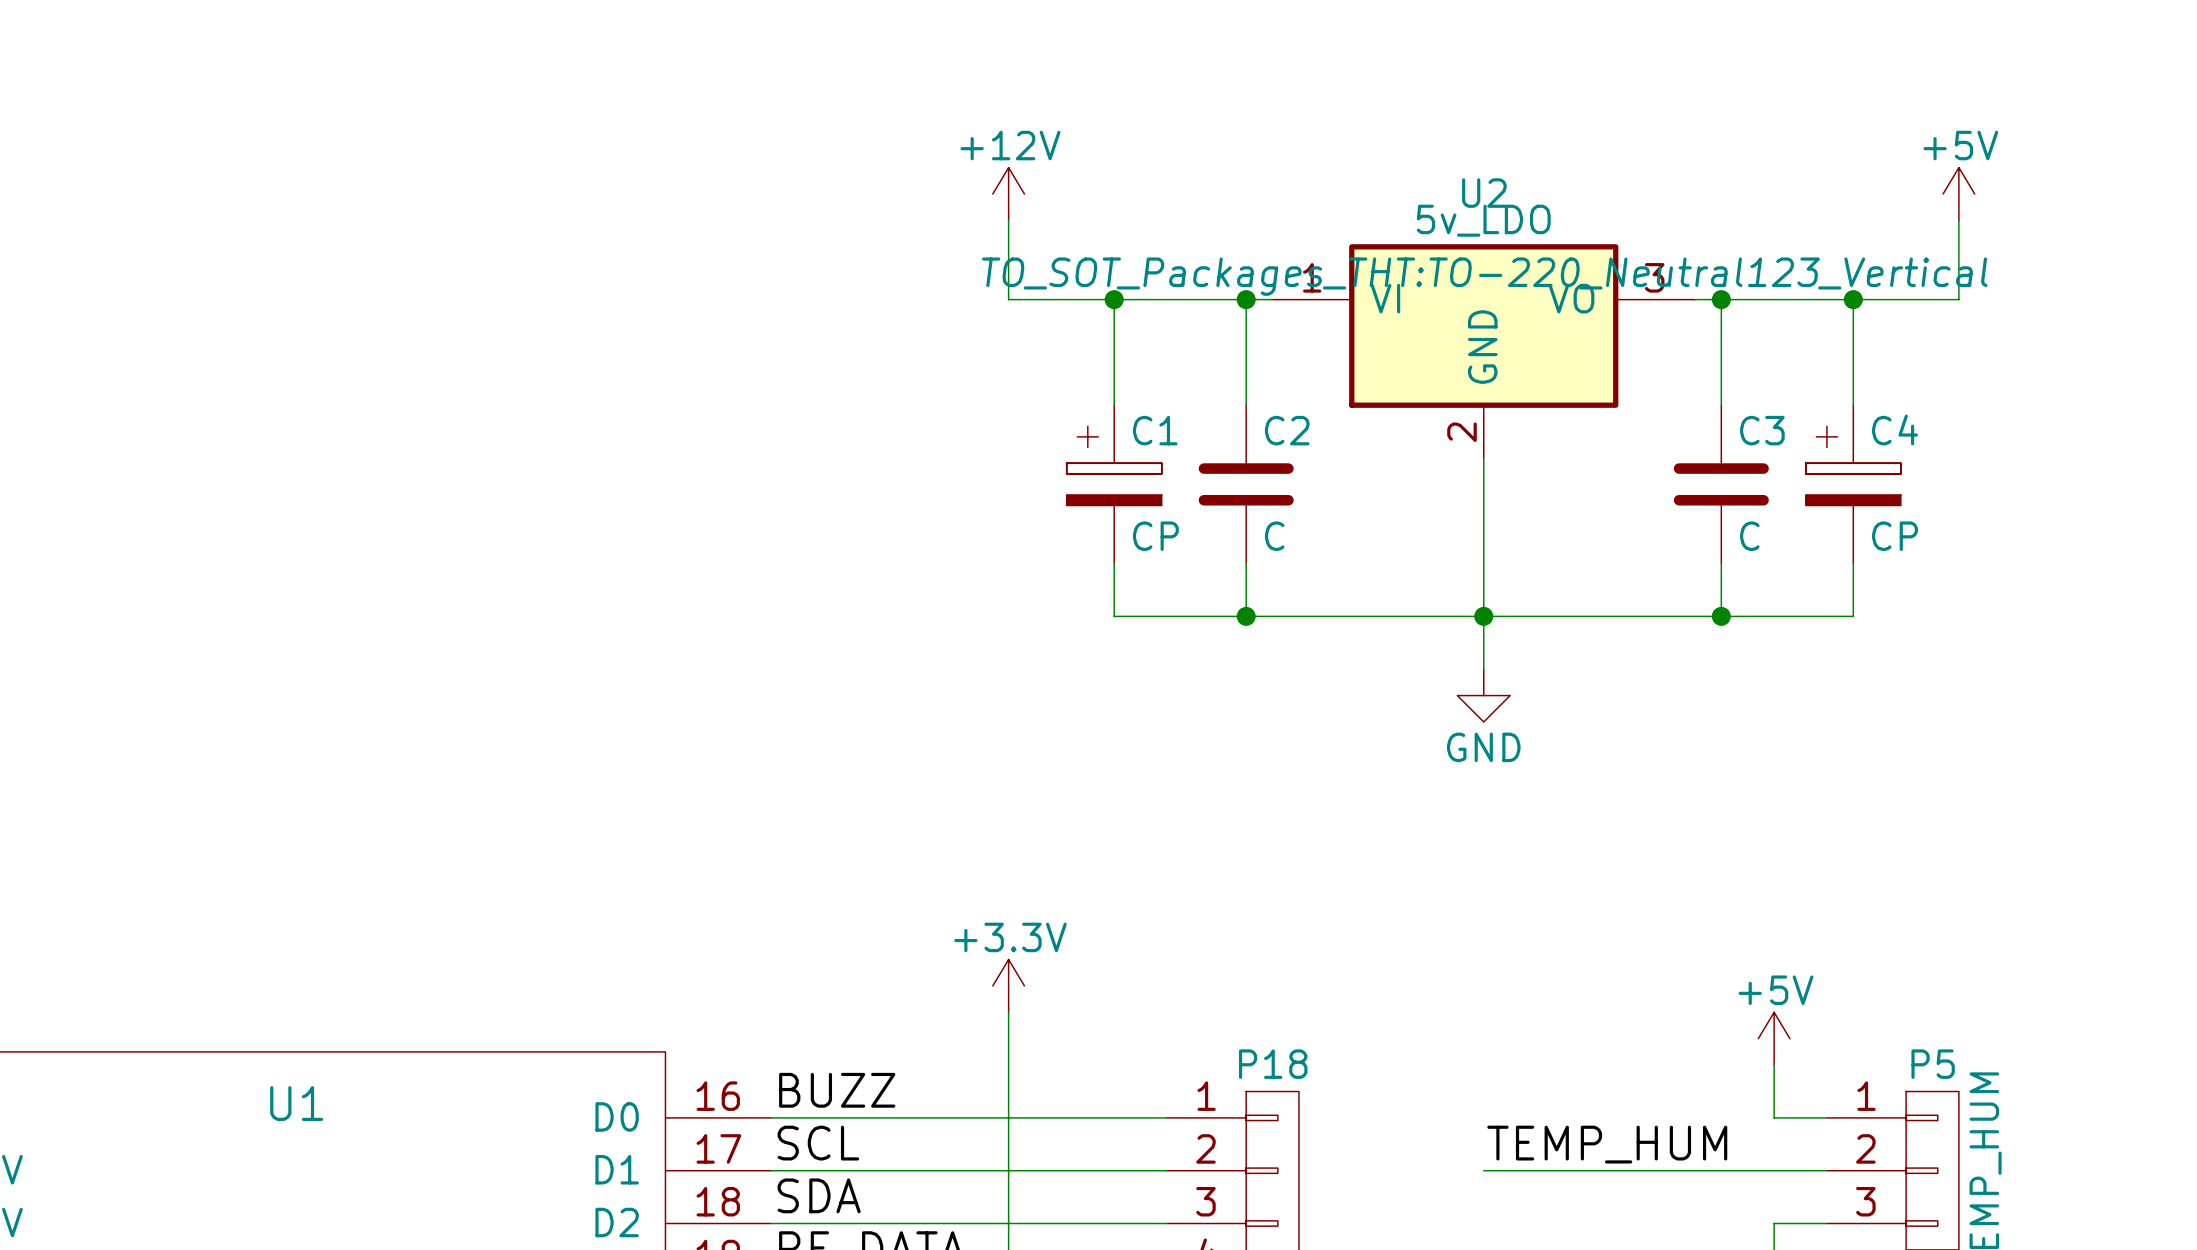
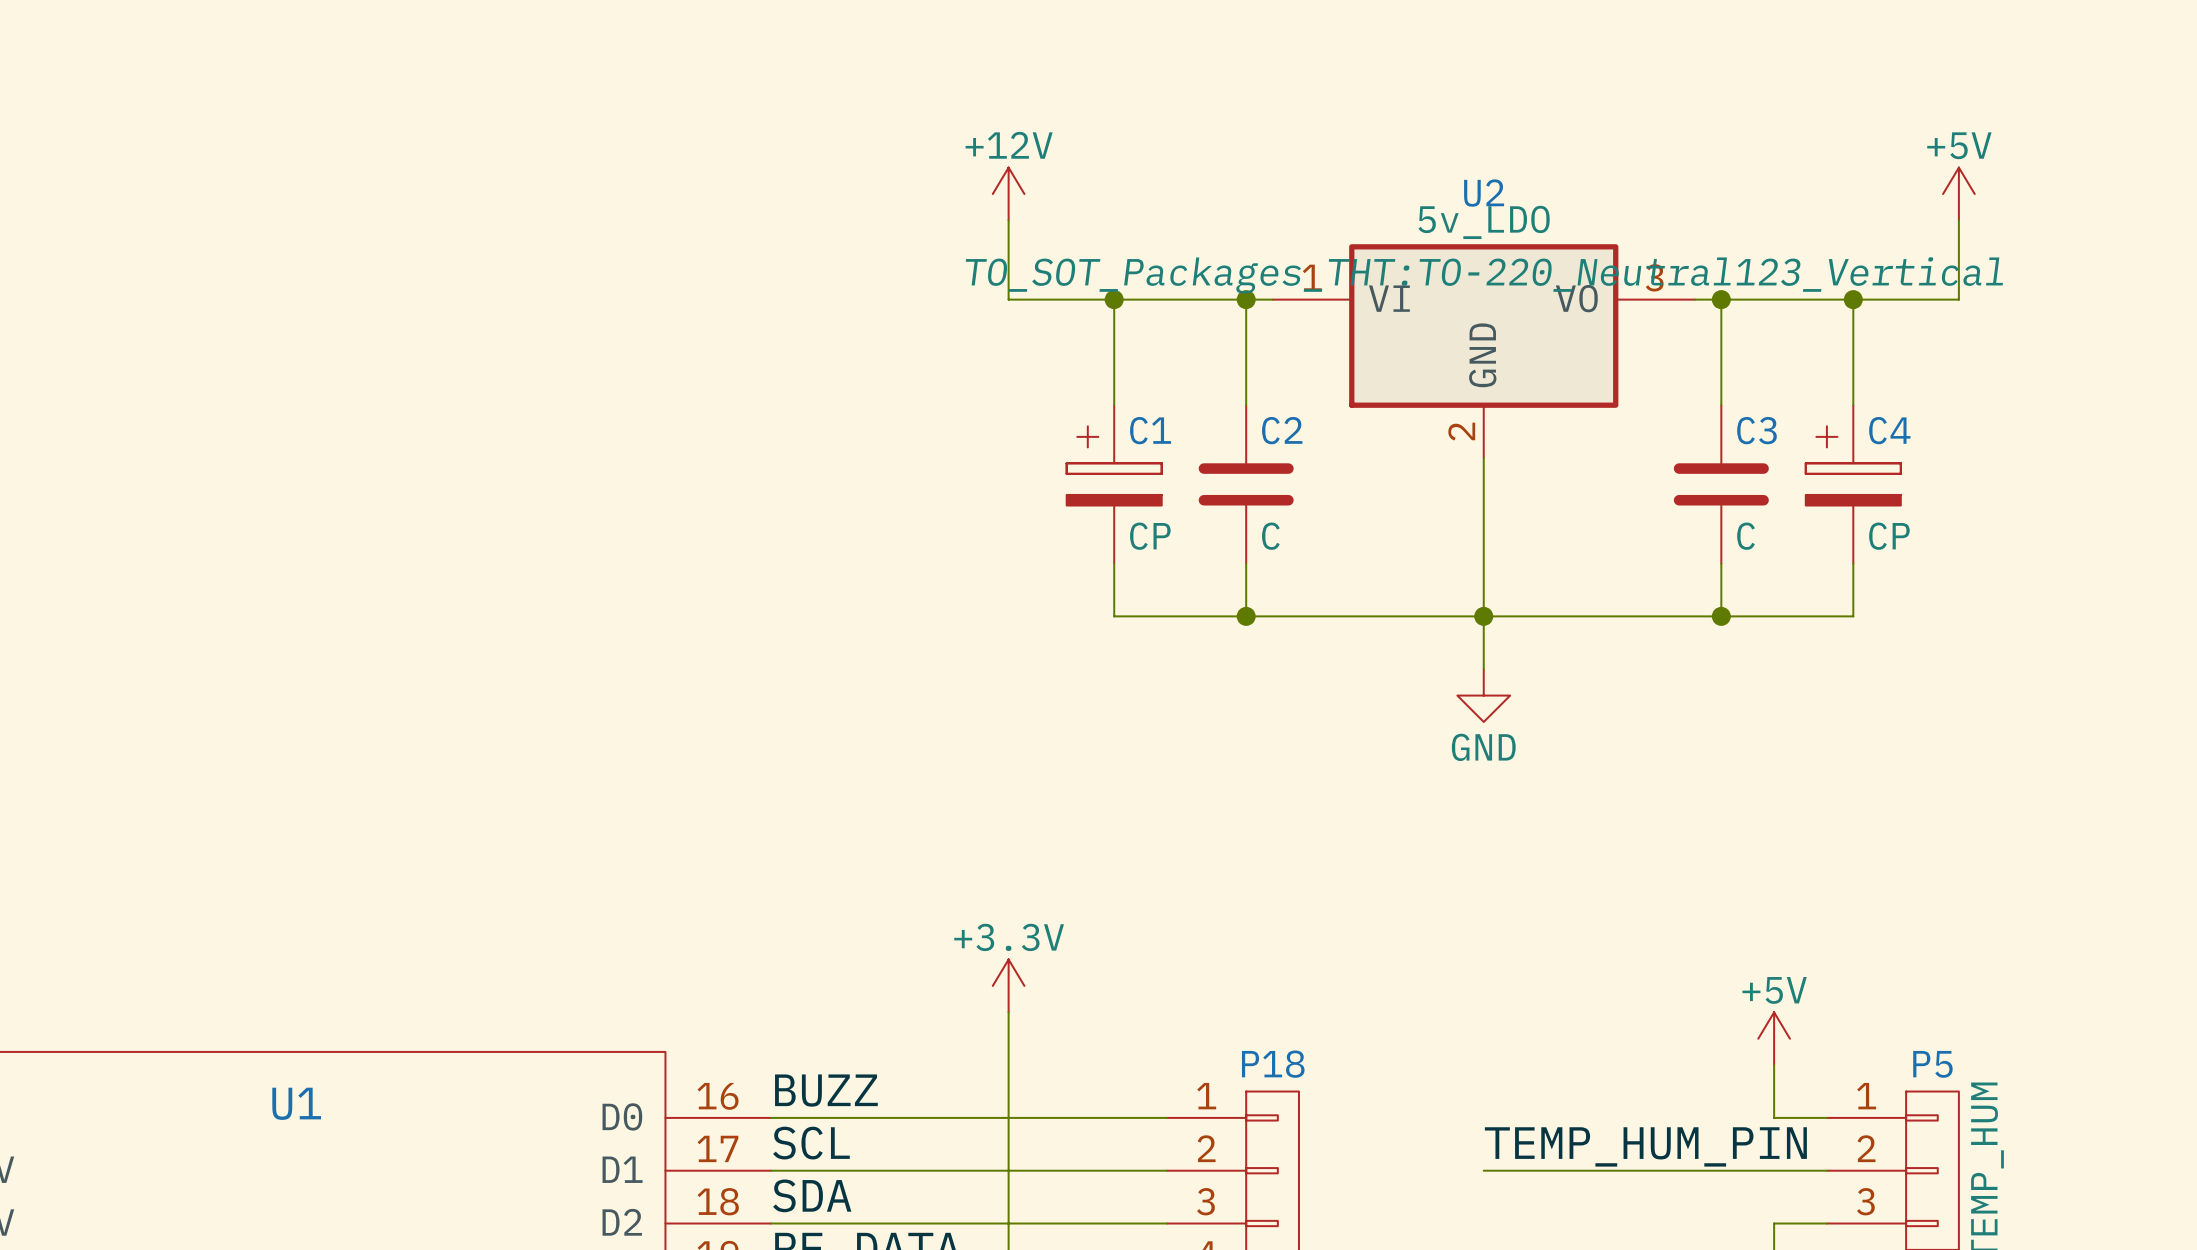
label: TEMP_HUM (1607, 1144) -> TEMP_HUM_PIN (1645, 1146)

